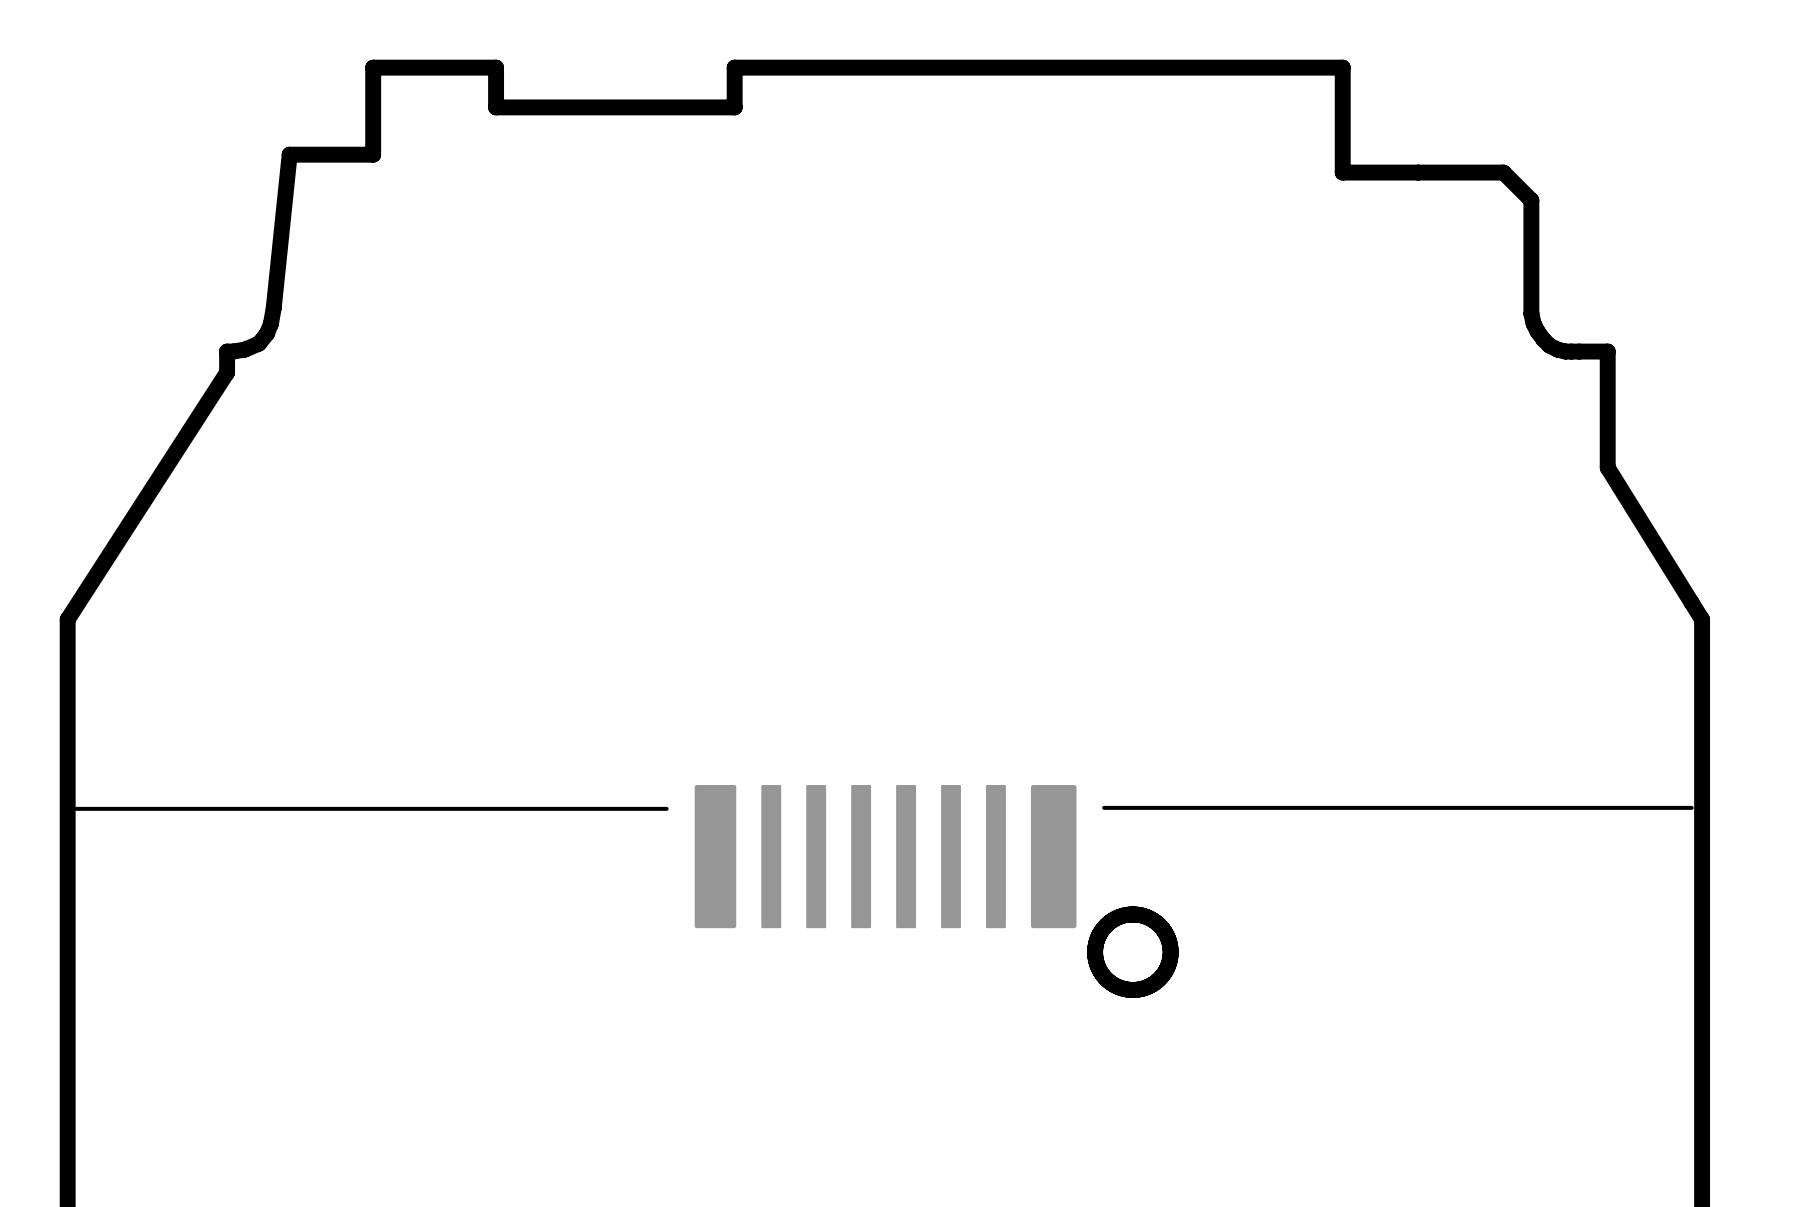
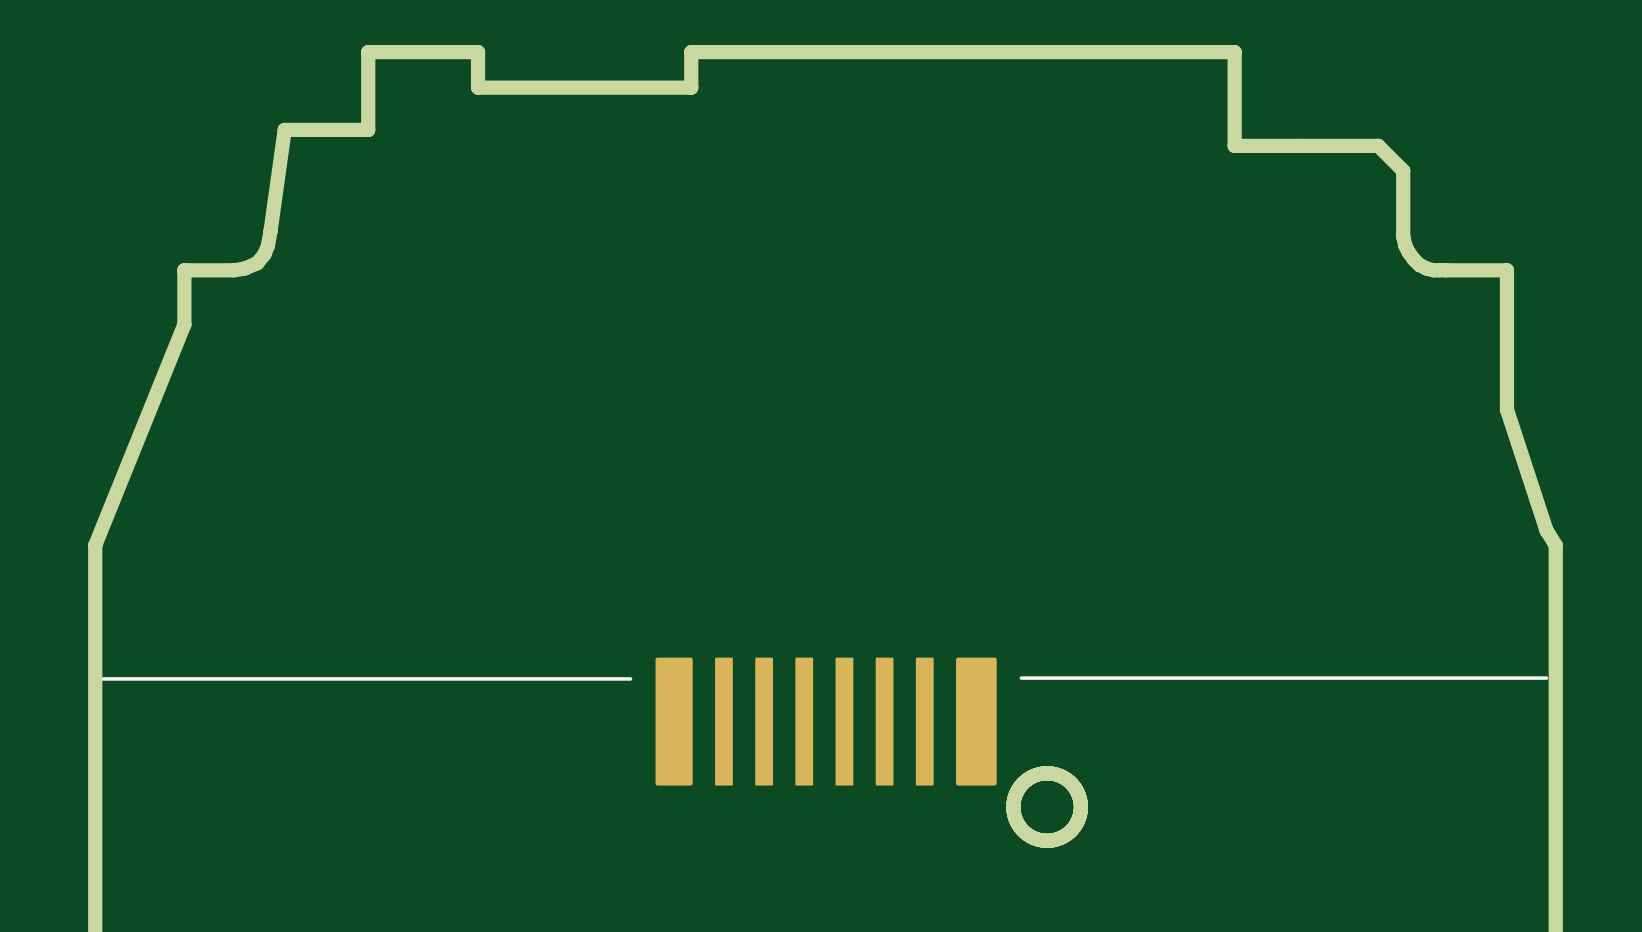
board edge: (289, 154) (273, 307) (266, 333) (259, 343) (245, 349) (227, 351) (227, 372) (67, 619) -> (293, 129) (284, 129) (270, 231) (264, 254) (257, 263) (244, 268) (184, 270) (184, 324) (95, 545)
board edge: (1531, 274) (1531, 313) (1533, 323) (1543, 339) (1549, 345) (1565, 351) (1607, 351) (1607, 467) (1691, 602) -> (1403, 236) (1408, 252) (1419, 264) (1426, 268) (1433, 270) (1506, 270) (1506, 409) (1546, 530)
line: (1104, 807) (1691, 807) -> (1021, 678) (1546, 678)
line: (76, 808) (666, 808) -> (102, 678) (630, 678)
part position: (885, 856) -> (826, 721)
board edge: (1131, 914) (1116, 918) (1104, 926) (1097, 939) (1095, 954) (1098, 968) (1107, 980) (1120, 987) (1134, 989) (1149, 986) (1160, 977) (1168, 964) (1170, 950) (1166, 935) (1158, 924) (1145, 916) (1131, 914) -> (1045, 773) (1032, 776) (1022, 784) (1015, 795) (1013, 808) (1016, 821) (1024, 832) (1035, 838) (1048, 840) (1061, 837) (1072, 829) (1078, 818) (1080, 805) (1077, 792) (1069, 782) (1058, 775) (1045, 773)

